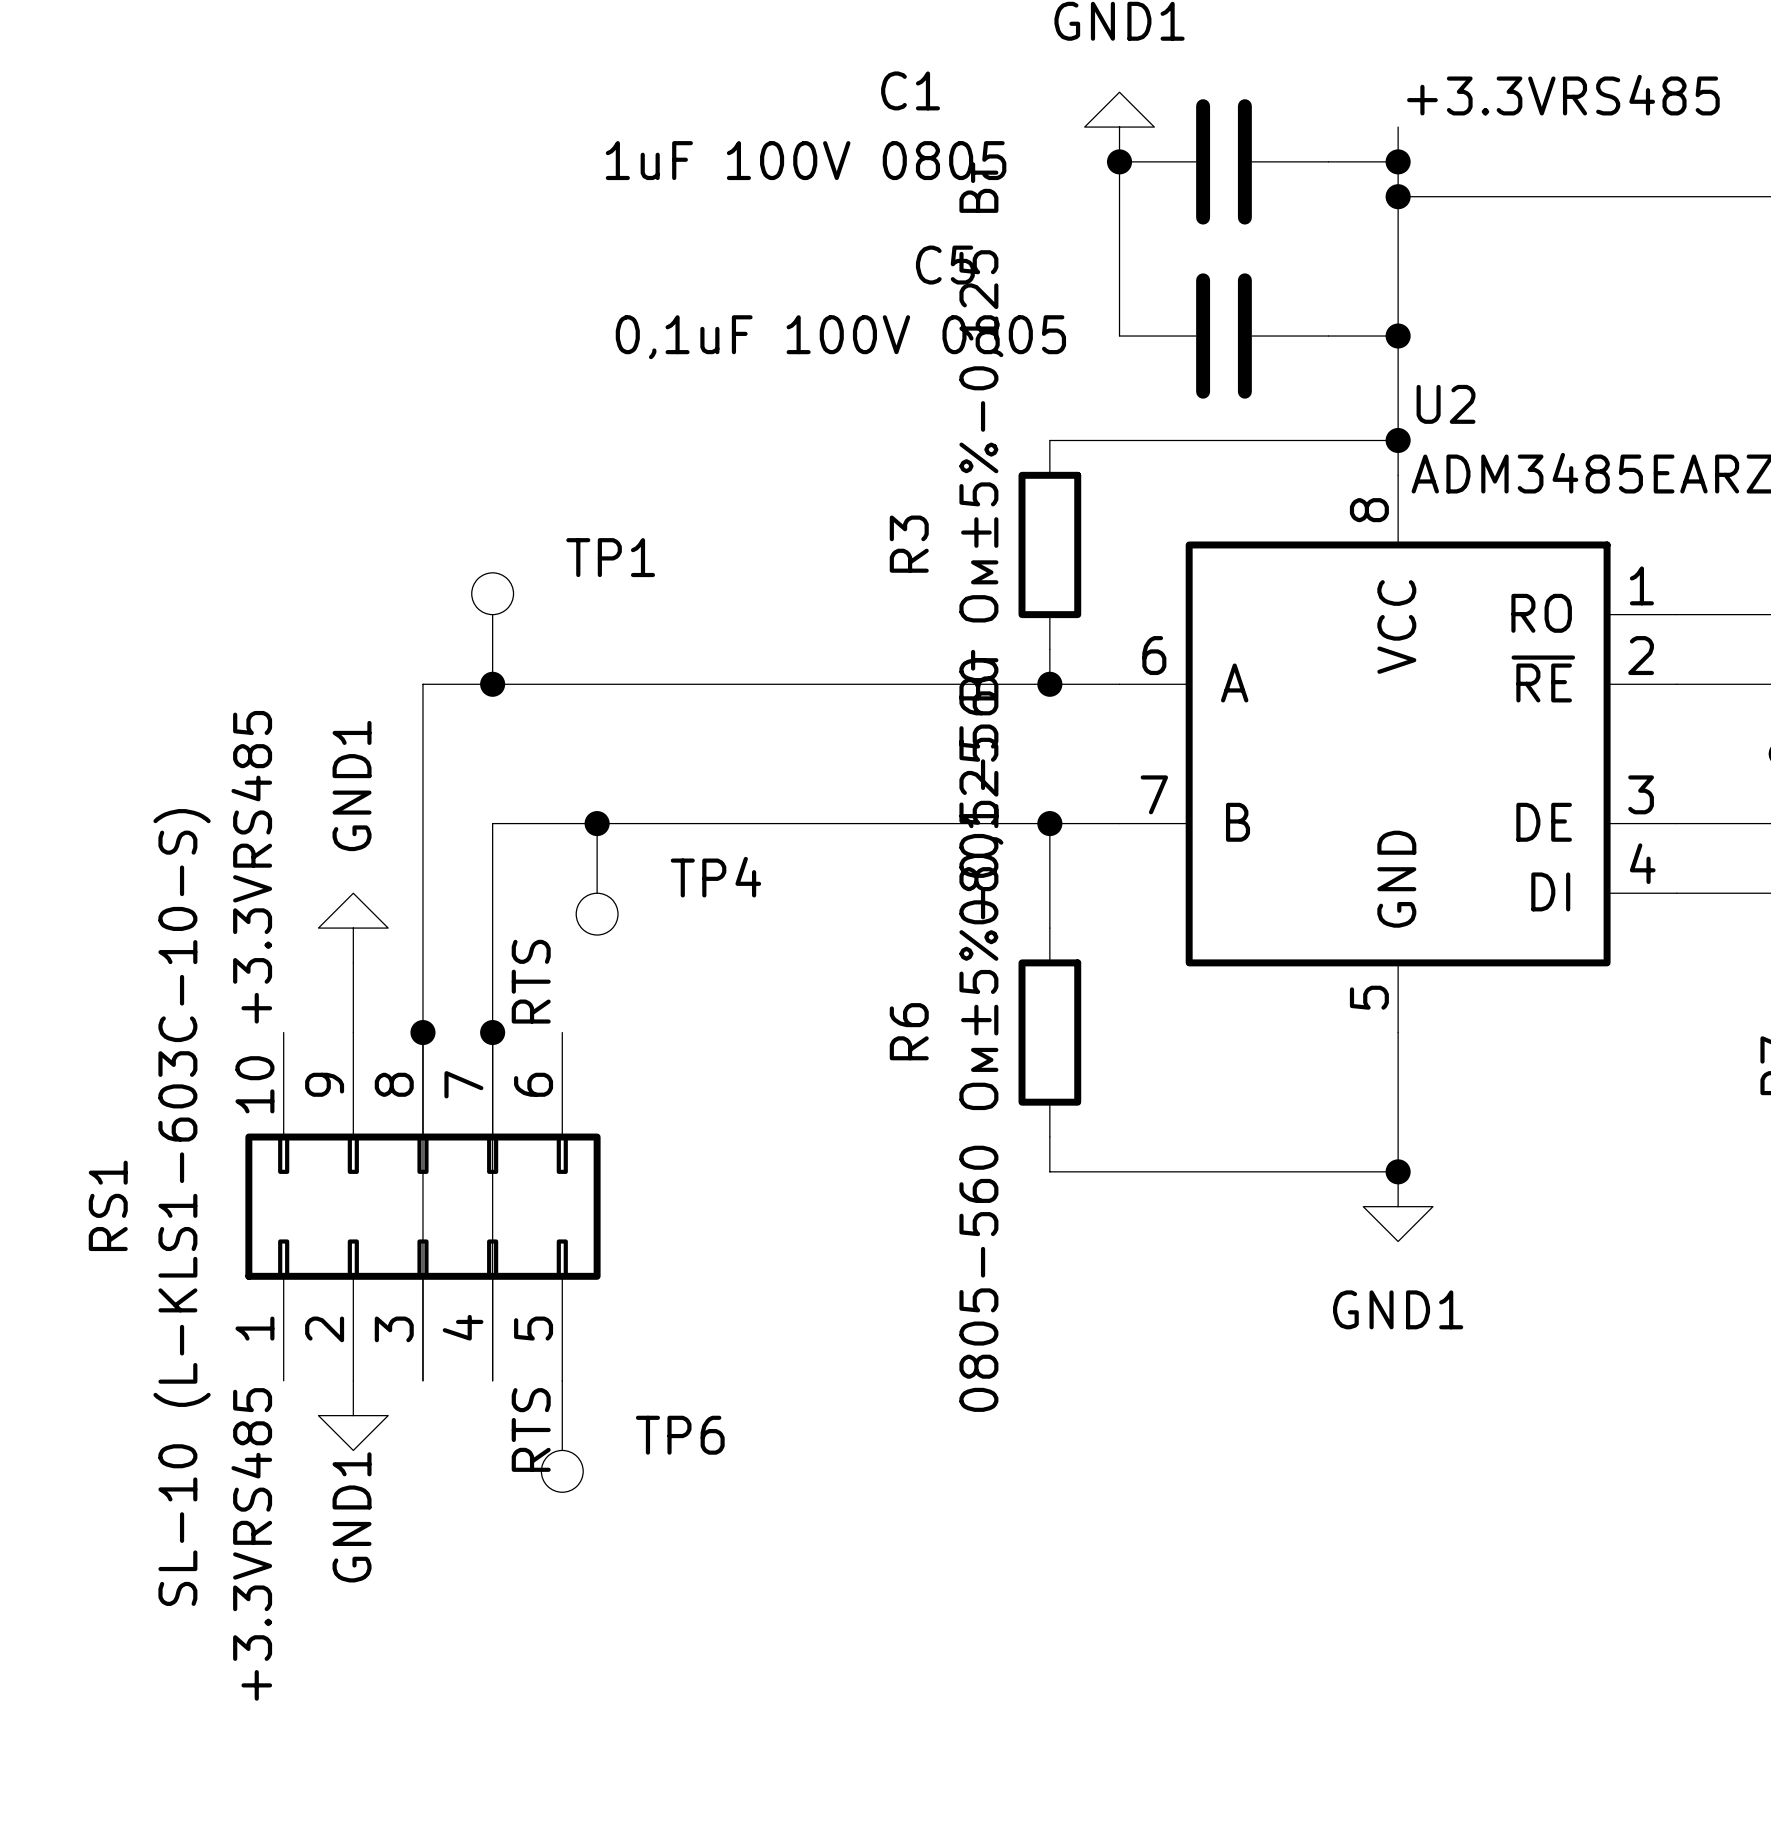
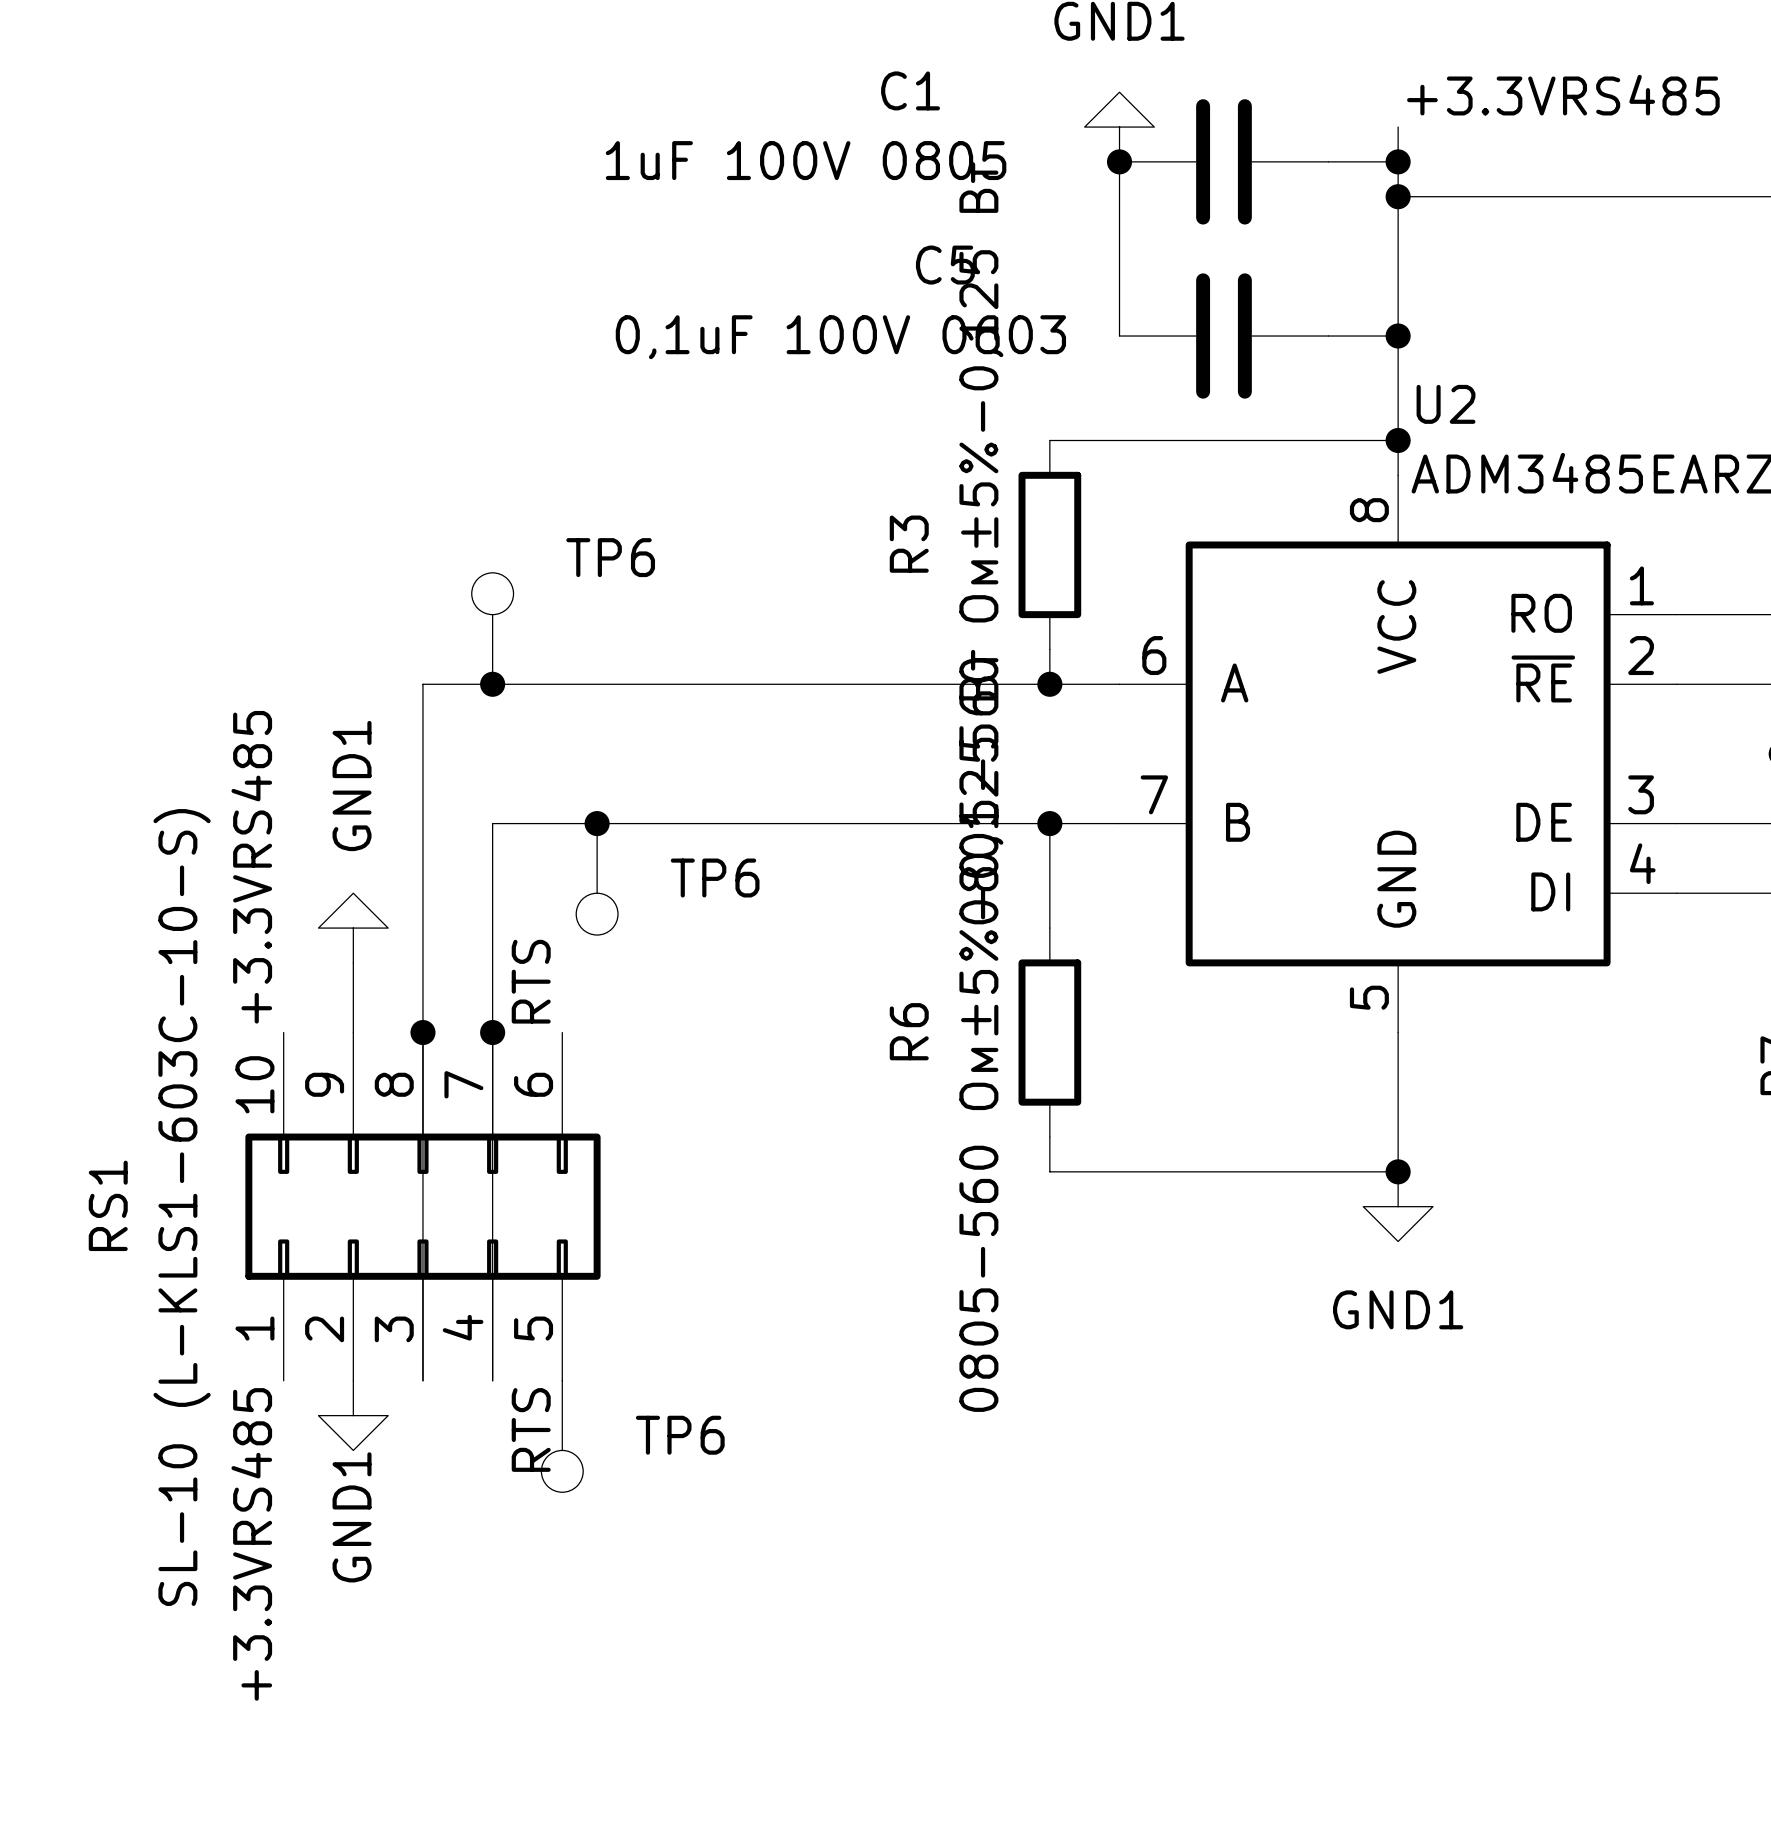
C5 value: 0,1uF 100V 0805 (840, 337) -> 0,1uF 100V 0603 (840, 337)
TP1 name: TP1 (610, 557) -> TP6 (610, 557)
TP4 name: TP4 (715, 877) -> TP6 (715, 878)

